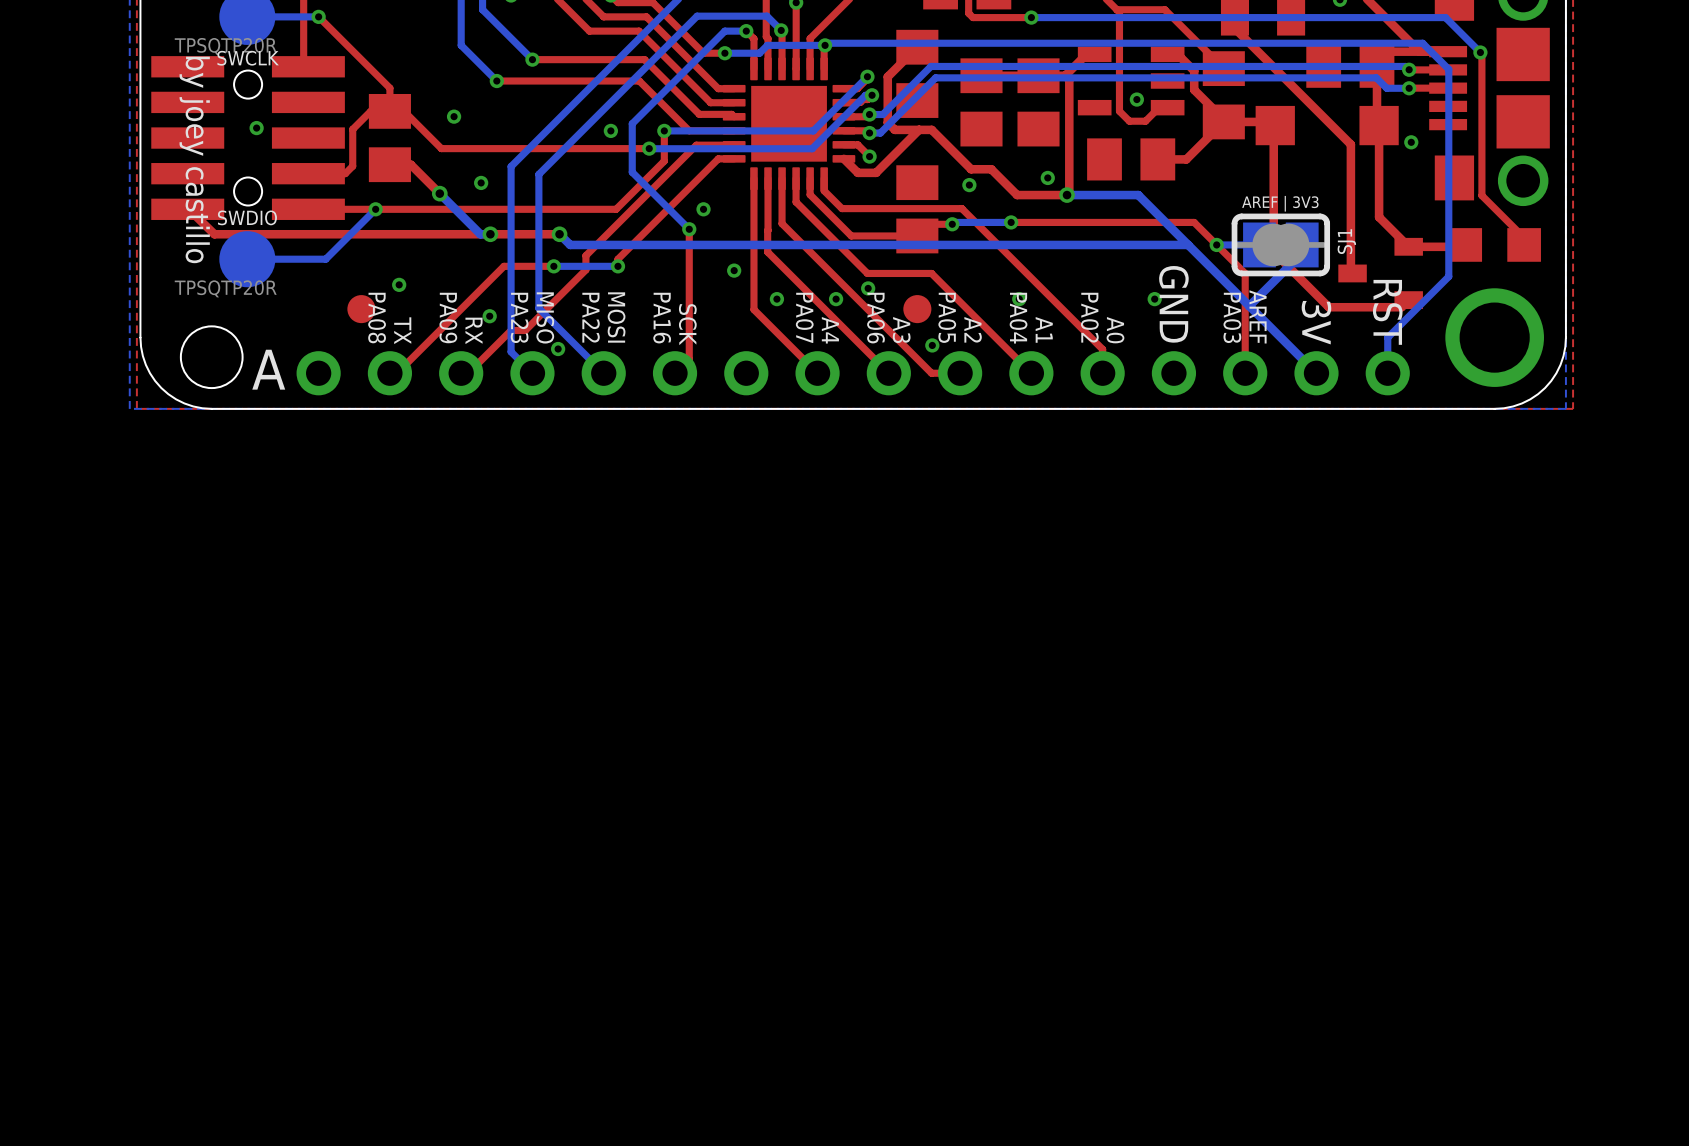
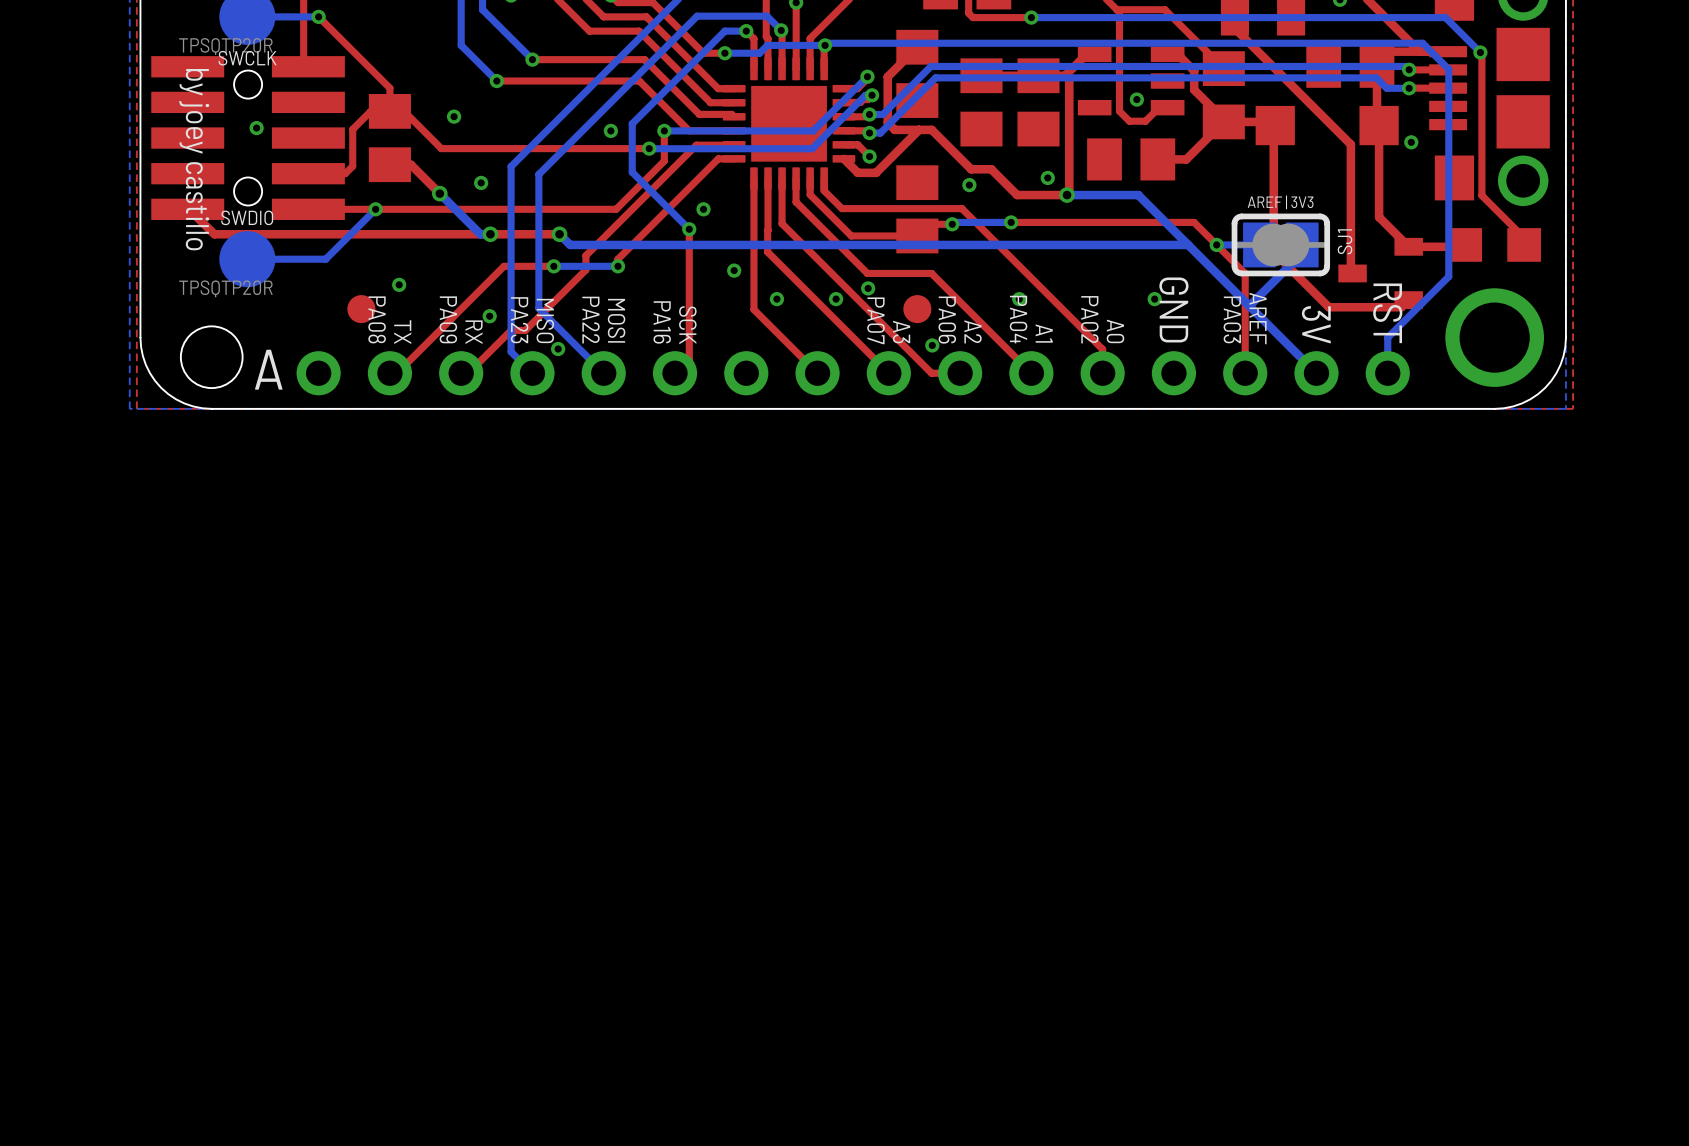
text: PA07 (804, 317) -> none
text: PA05 (947, 317) -> PA06 (947, 320)
text: PA06 (875, 318) -> PA07 (876, 320)
text: A4 (830, 330) -> none

